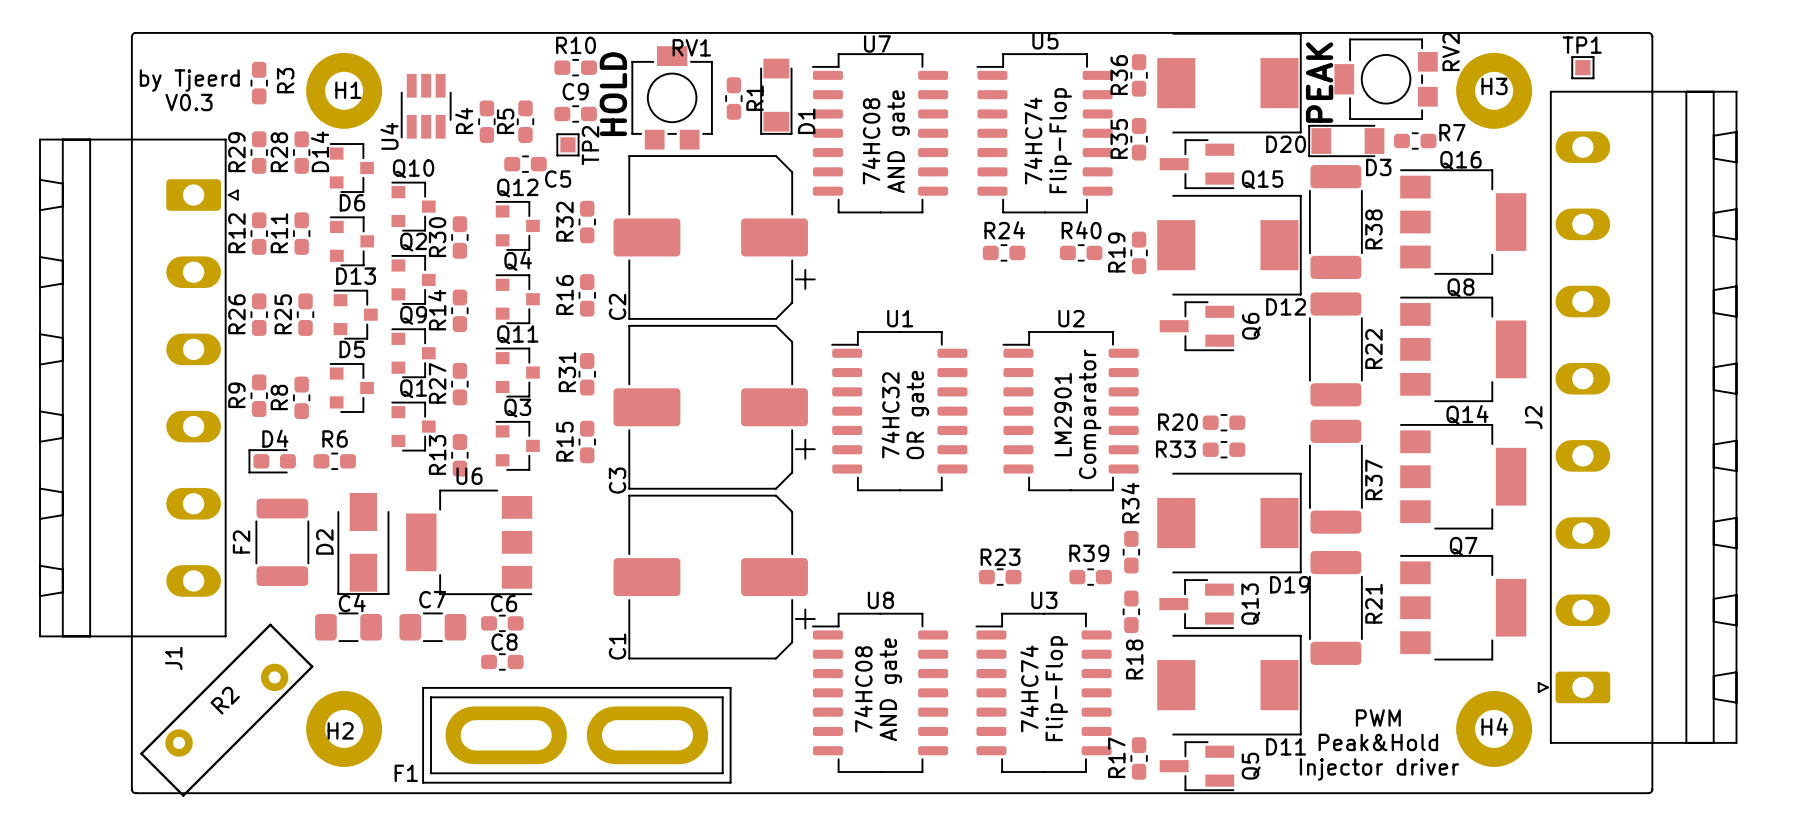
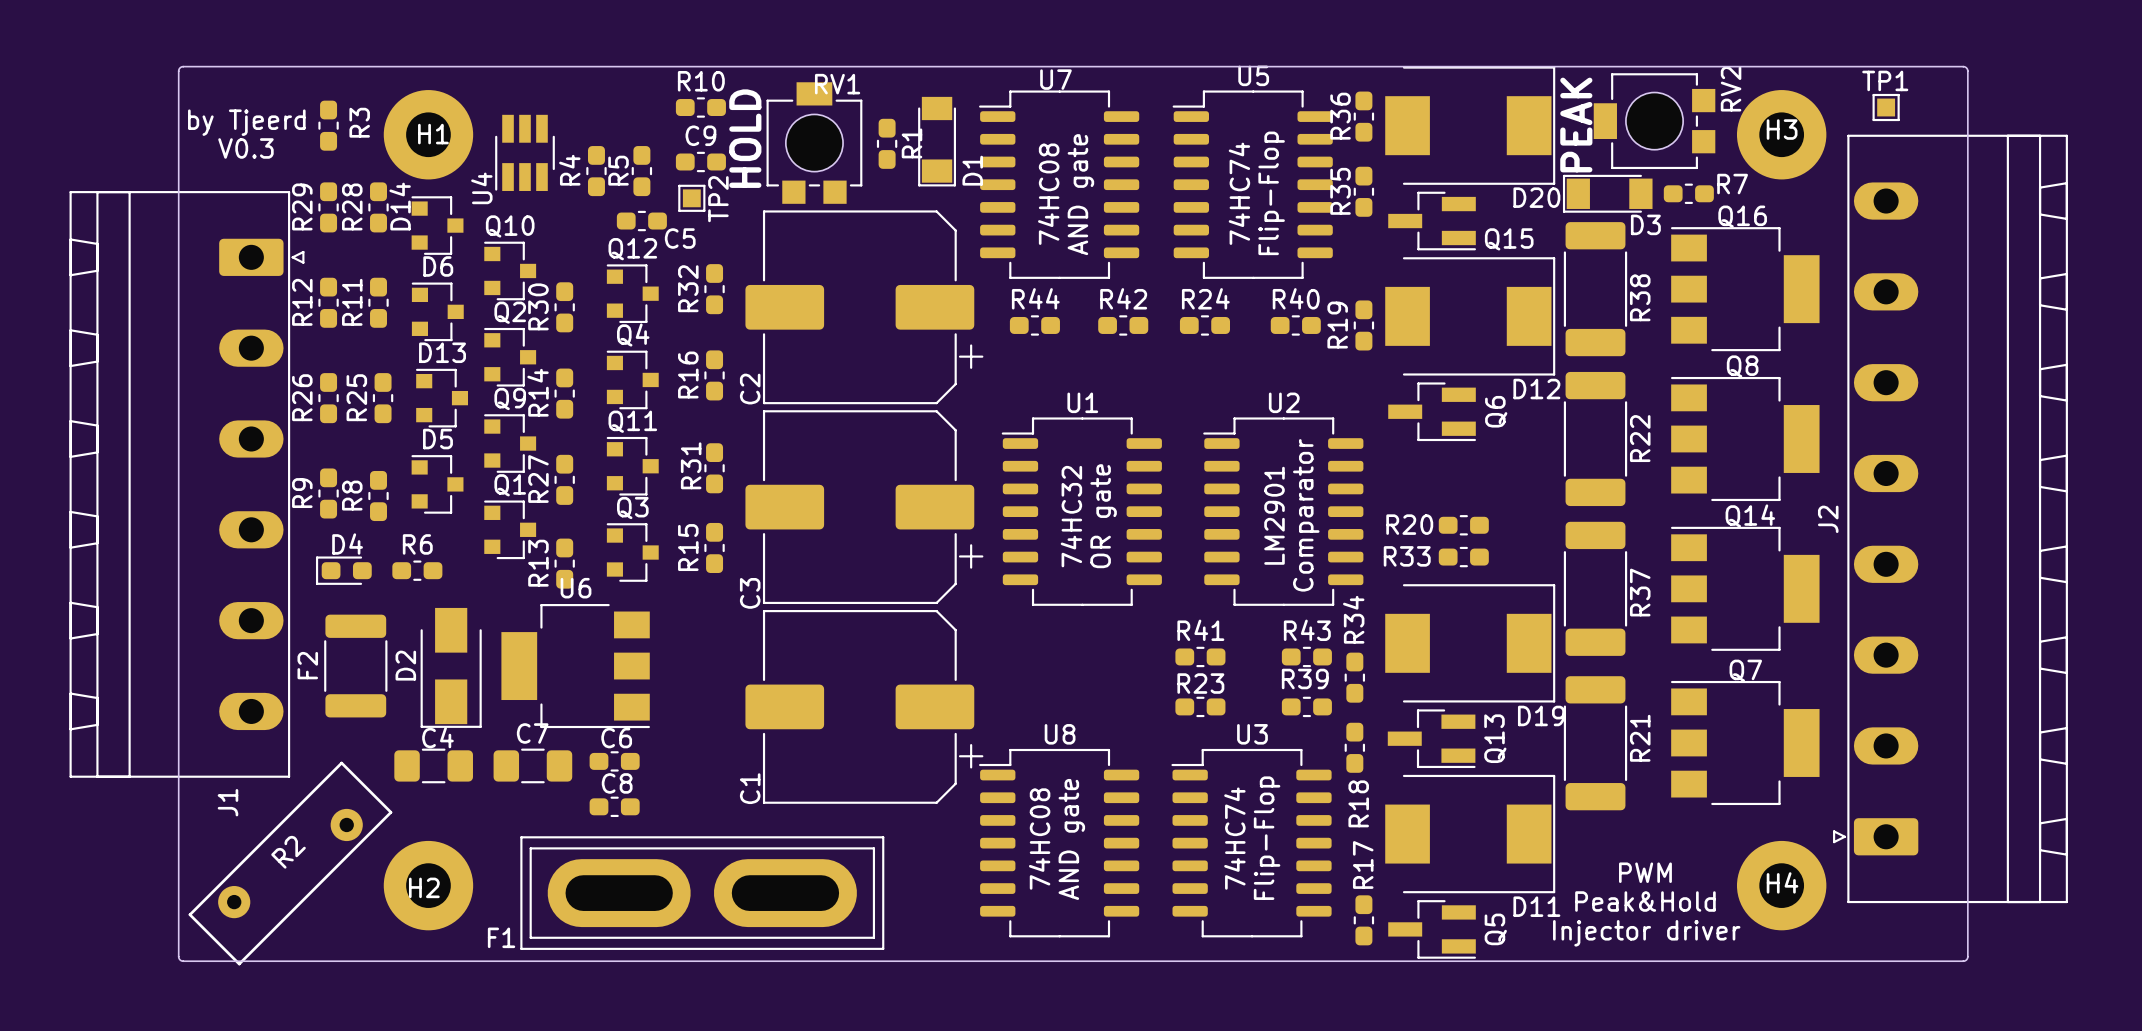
R44: none -> (1034, 325)
R42: none -> (1123, 325)
R41: none -> (1200, 656)
R43: none -> (1306, 656)
R17 name position: R17 (1116, 757) -> R17 (1363, 864)

